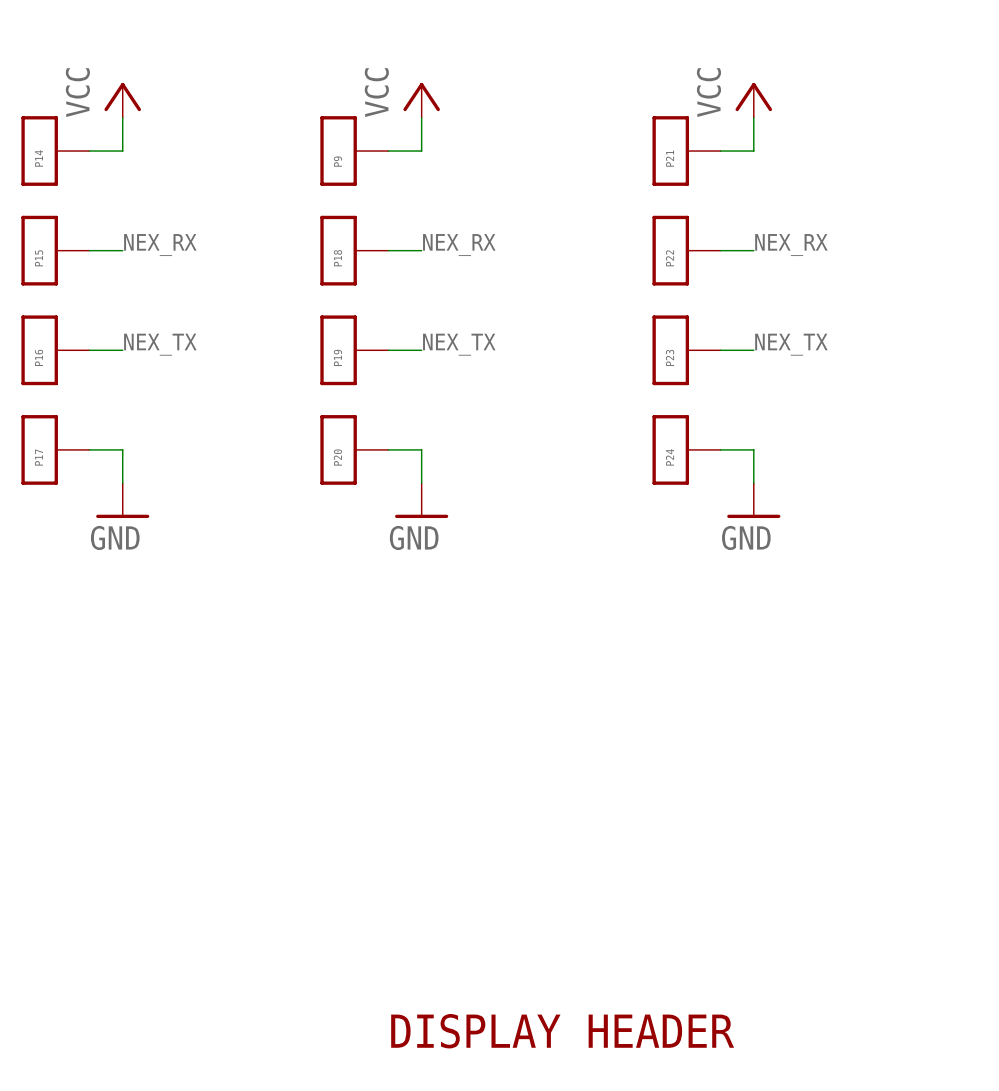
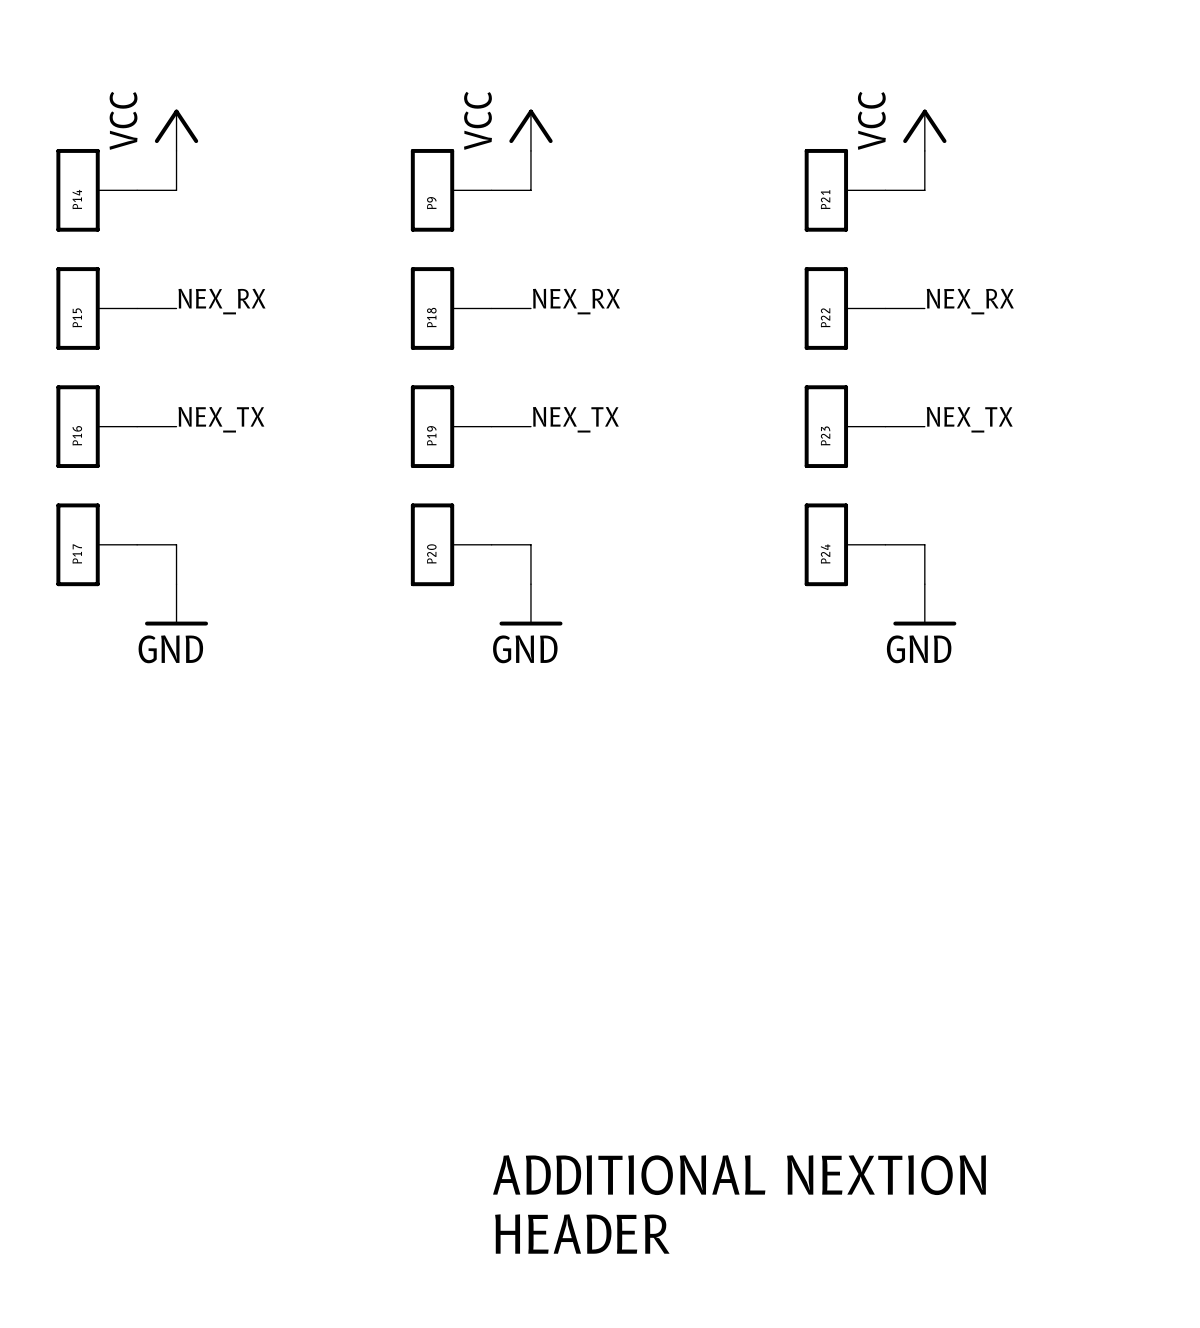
text: none -> ADDITIONAL NEXTION (739, 1175)
text: DISPLAY HEADER (562, 1031) -> HEADER (582, 1234)

